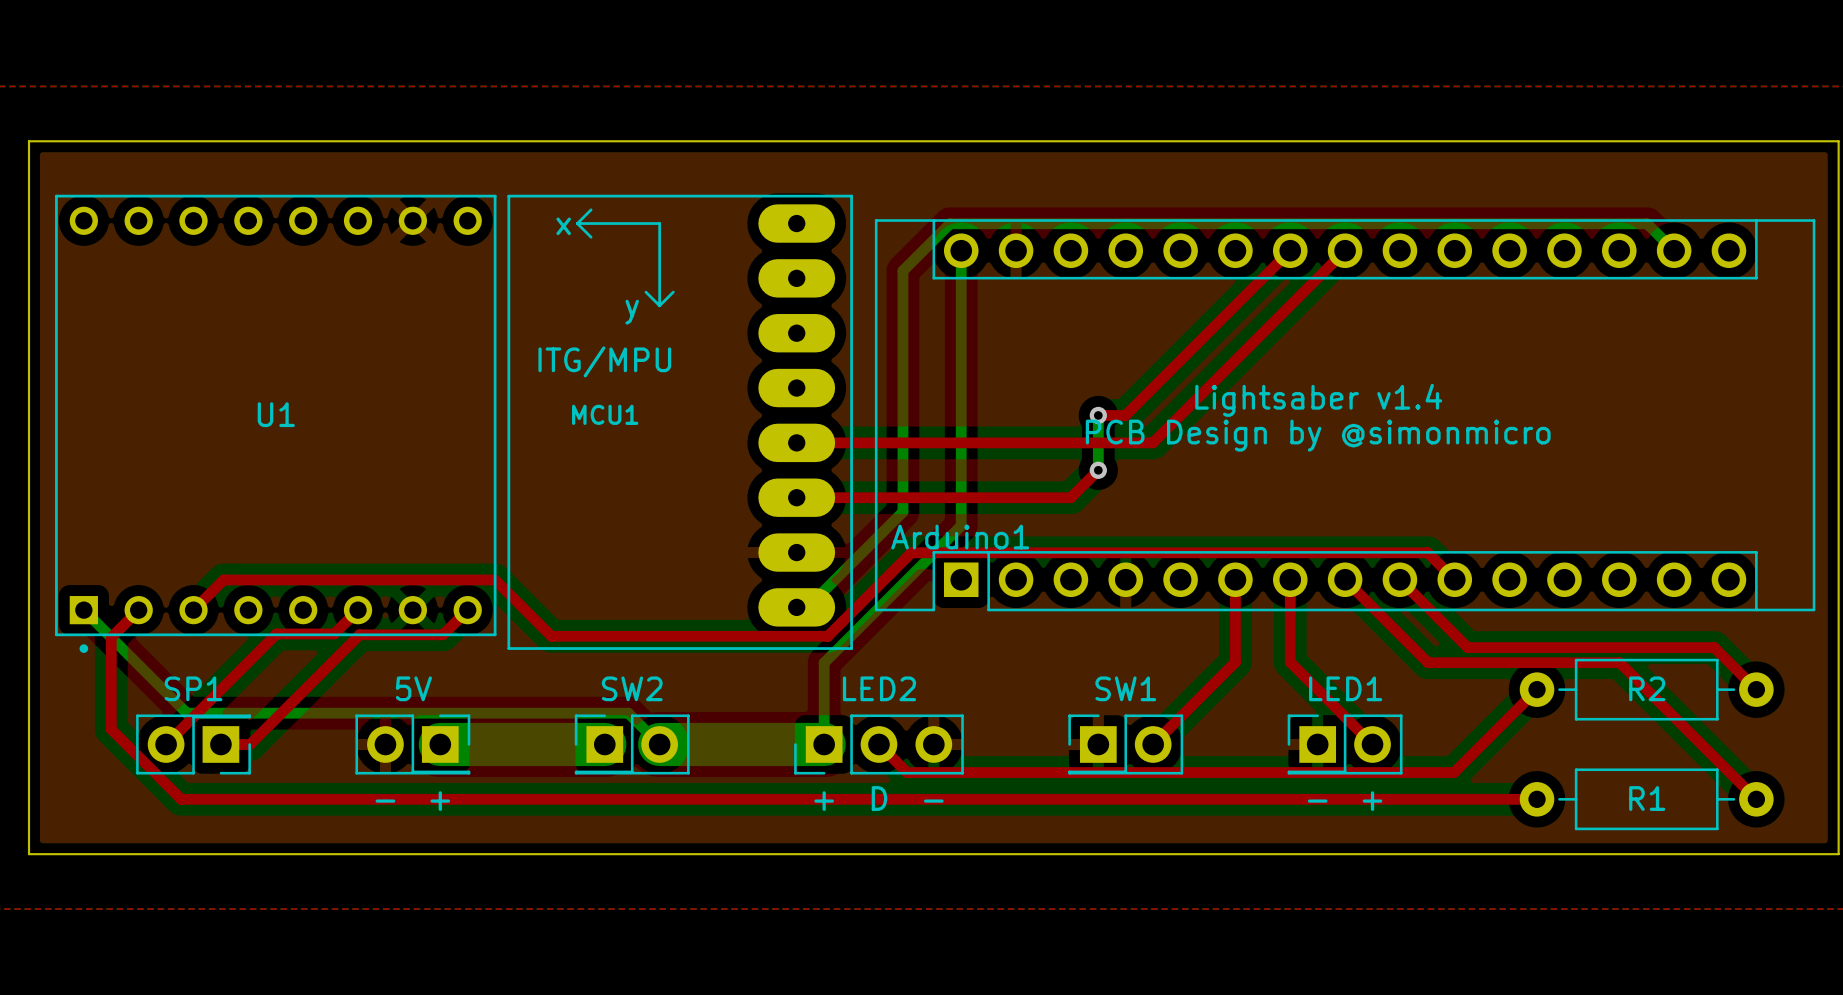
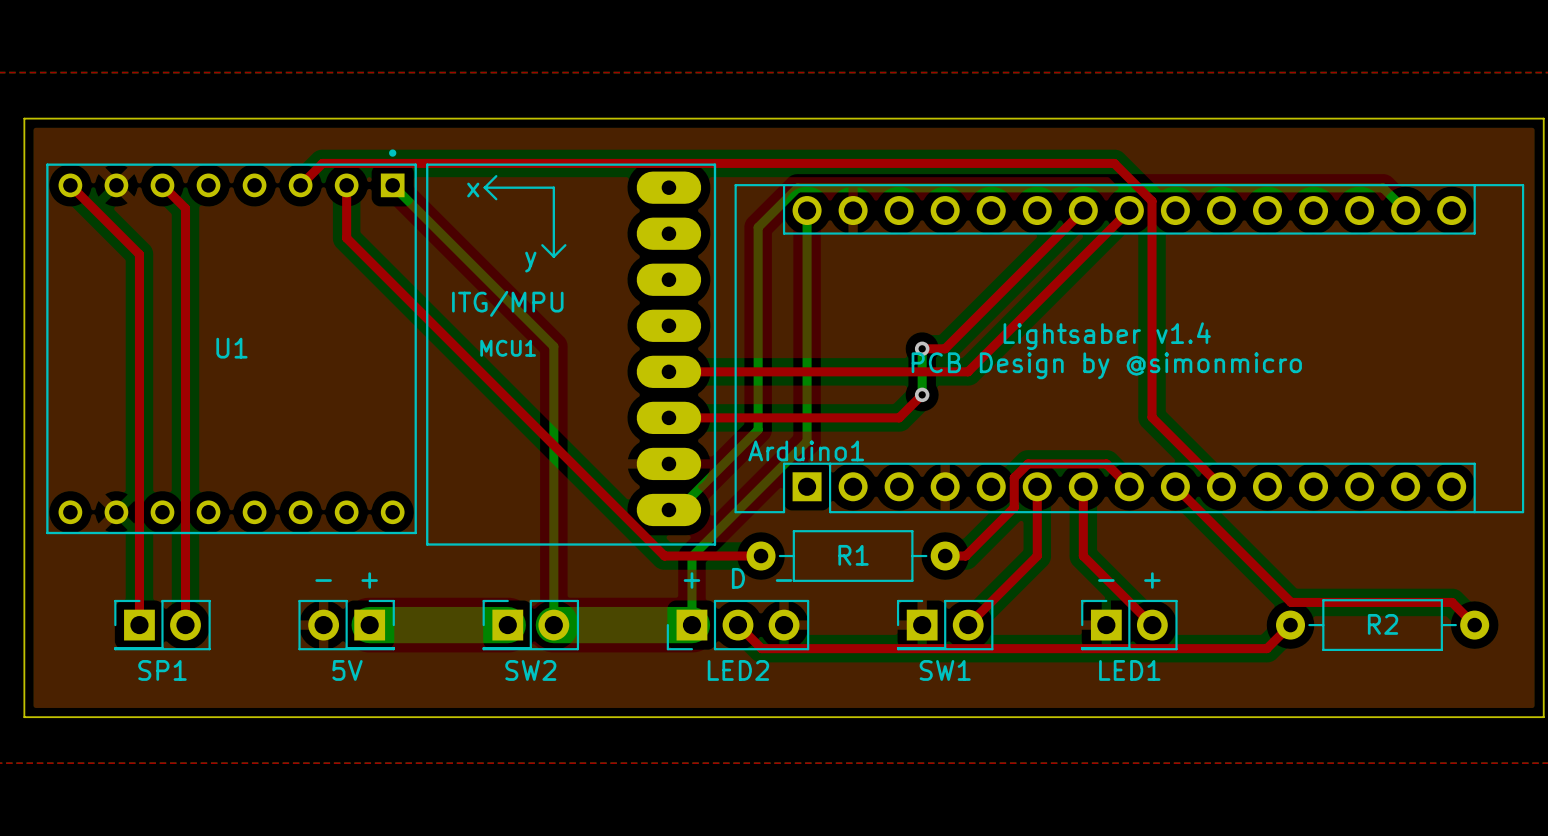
top track: none -> (346, 185) (346, 238) (664, 556) (761, 556)
U1 rotation: 0° (275, 423) -> 180° (231, 341)
top track: (1427, 552) (911, 552) (827, 636) (551, 636) (495, 579) (223, 579) (193, 610) -> (1198, 464) (1152, 417) (1152, 201) (1114, 163) (322, 163) (300, 185)
top track: (1345, 579) (1428, 662) (1619, 662) (1756, 799) -> (1129, 486) (1106, 463) (1028, 463) (1014, 477) (1014, 507) (965, 556) (945, 556)
bottom track: (83, 610) (186, 713) (628, 713) (659, 744) -> (392, 185) (553, 346) (553, 625)
top track: (138, 610) (111, 637) (111, 729) (181, 799) (1537, 799) -> none
top track: (358, 610) (334, 633) (276, 633) (166, 744) -> (70, 185) (139, 254) (139, 625)
top track: (467, 610) (443, 634) (359, 634) (250, 744) (220, 744) -> (162, 185) (185, 208) (185, 625)
top track: (1467, 647) (1714, 647) (1756, 689) -> (1232, 543) (1291, 602) (1452, 602) (1474, 625)
5V name position: 5V (413, 688) -> 5V (347, 670)
SW2 name position: SW2 (632, 688) -> SW2 (530, 670)
LED2 name position: LED2 (879, 688) -> LED2 (738, 670)
SW1 name position: SW1 (1125, 688) -> SW1 (945, 670)
LED1 name position: LED1 (1345, 688) -> LED1 (1129, 670)
top track: (1537, 689) (1454, 772) -> (1290, 625) (1266, 648) (1220, 648)
R2 position: (1646, 689) -> (1382, 625)
SP1 rotation: 0° (193, 744) -> 180° (162, 625)
text position: D (879, 798) -> D (738, 578)
R1 position: (1646, 799) -> (853, 556)
text position: - (385, 801) -> - (323, 580)
text position: + (440, 801) -> + (369, 580)
text position: + (824, 801) -> + (691, 580)
text position: - (933, 801) -> - (784, 580)
text position: - (1317, 801) -> - (1106, 580)
text position: + (1372, 801) -> + (1152, 580)

